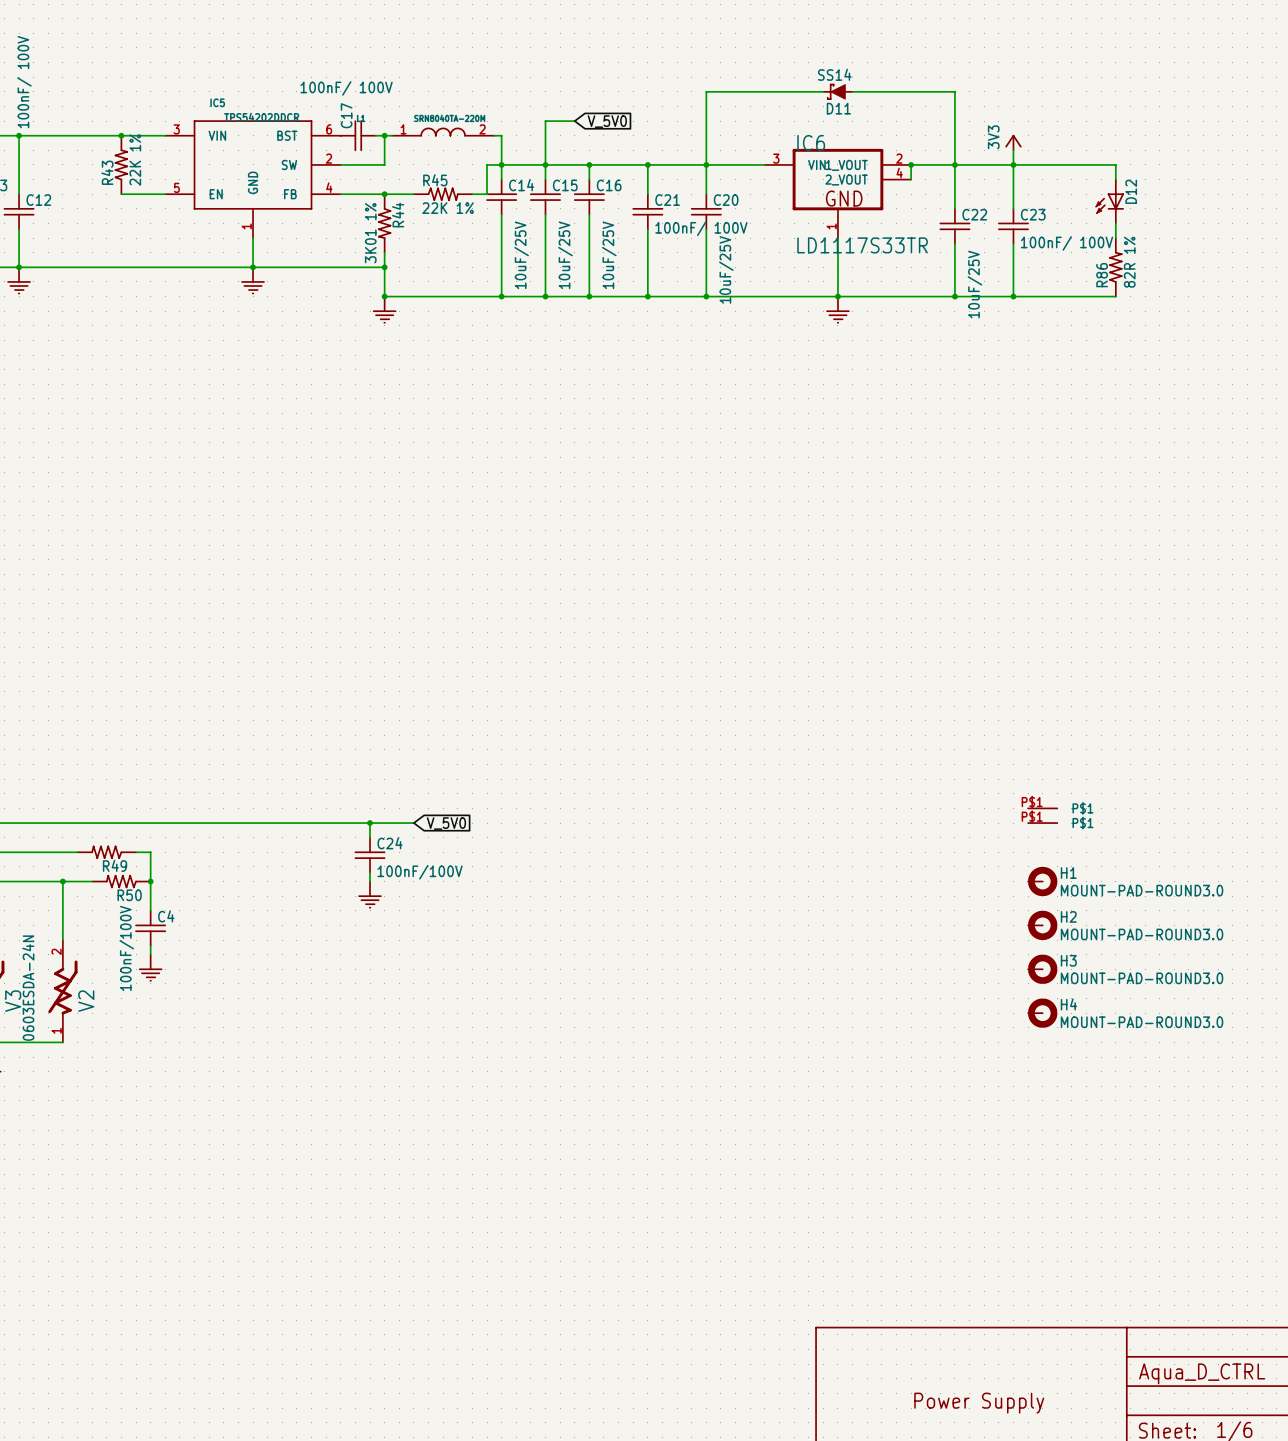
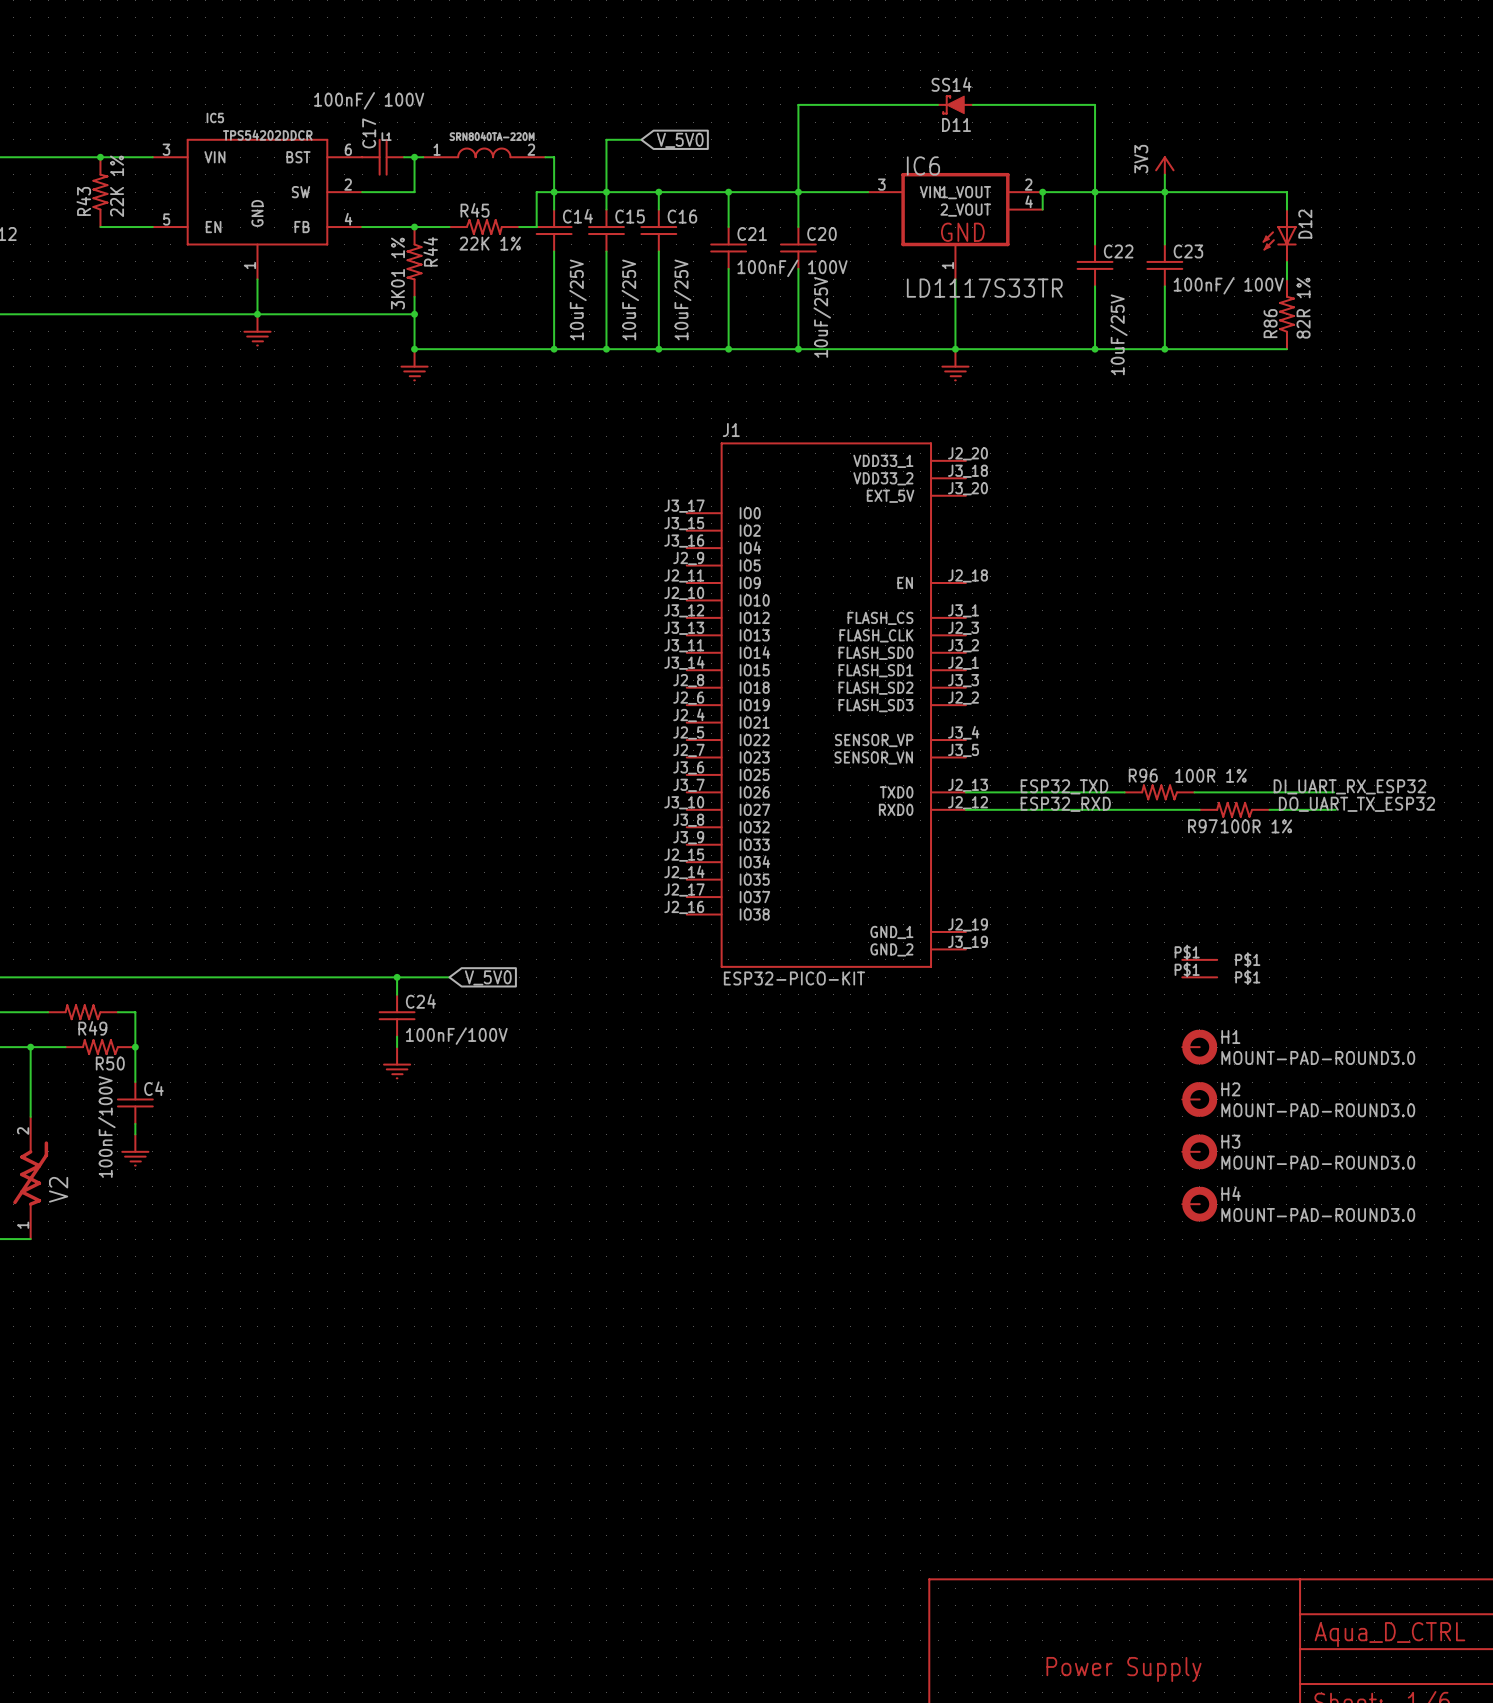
J1: none -> ESP32-PICO-KIT (826, 705)
label: none -> ESP32_TXD (1064, 786)
label: none -> DI_UART_RX_ESP32 (1349, 786)
wire: none -> (965, 792) (1124, 792)
R96: none -> 100R 1% (1159, 792)
wire: none -> (1194, 792) (1334, 792)
label: none -> ESP32_RXD (1065, 804)
label: none -> DO_UART_TX_ESP32 (1356, 804)
wire: none -> (965, 809) (1199, 809)
R97: none -> 100R 1% (1234, 809)
wire: none -> (1269, 809) (1335, 809)

